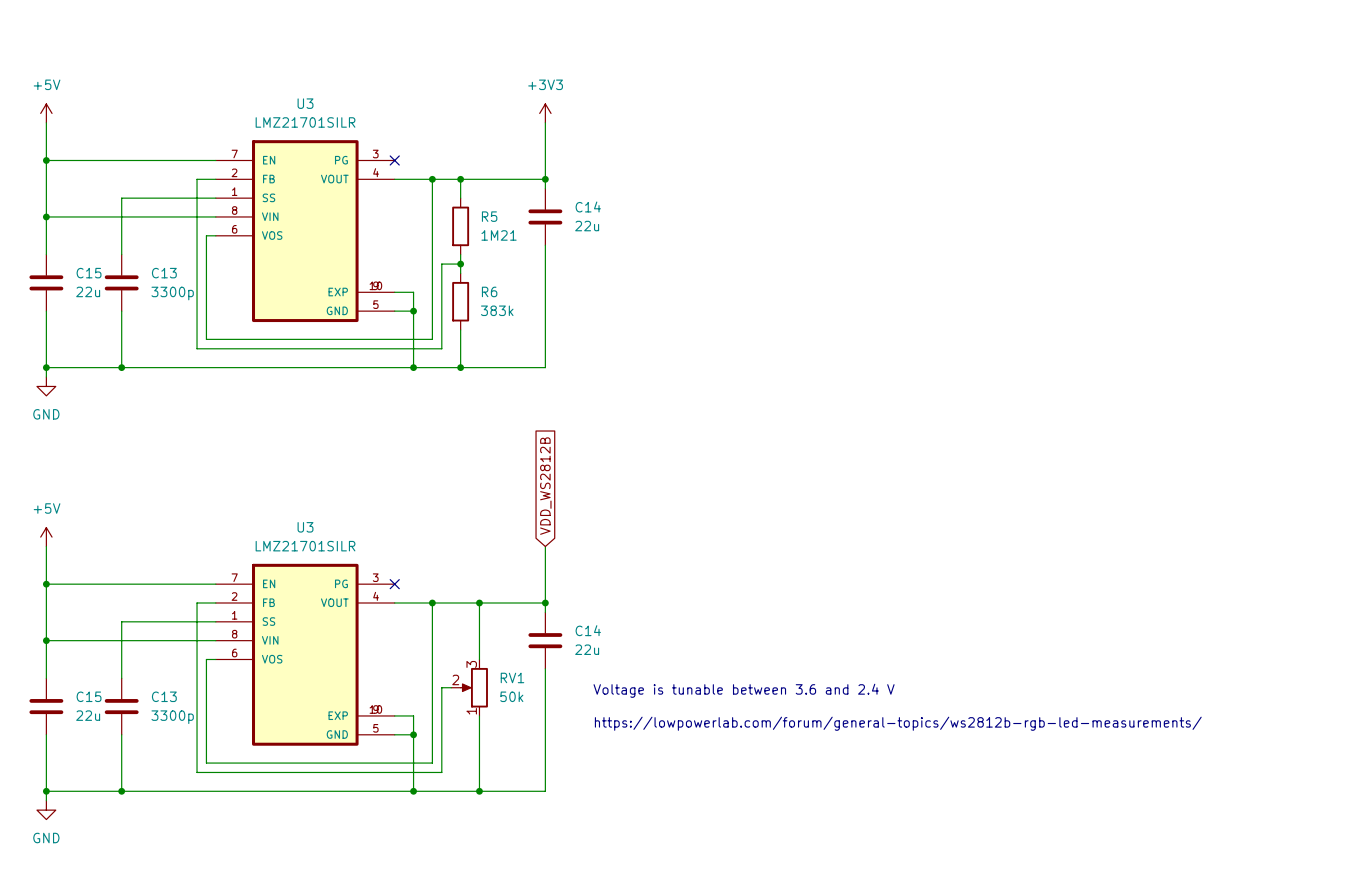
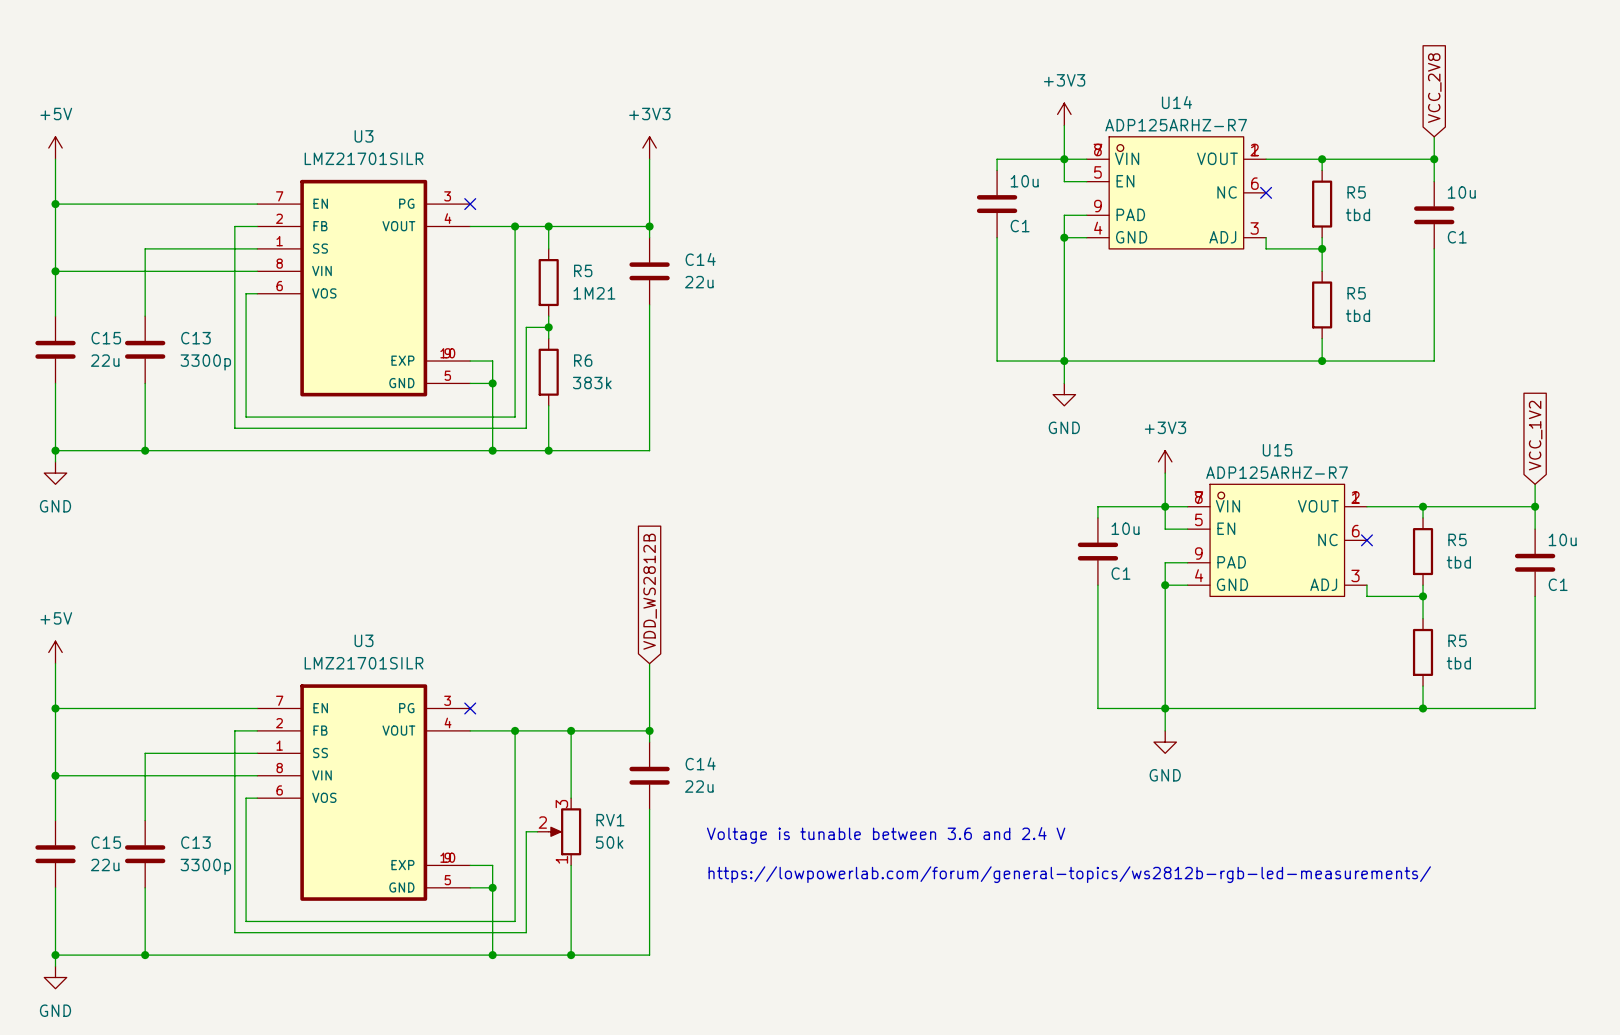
global label: none -> VCC_2V8 (1434, 88)
power symbol: none -> +3V3 (1064, 114)
wire: none -> (1064, 125) (1064, 181) (1086, 181)
wire: none -> (1434, 136) (1434, 181)
junction: none -> (1064, 159)
wire: none -> (1086, 159) (997, 159) (997, 170)
wire: none -> (1266, 159) (1434, 159)
wire: none -> (1322, 159) (1322, 170)
junction: none -> (1322, 159)
junction: none -> (1434, 159)
U14: none -> ADP125ARHZ-R7 (1176, 192)
no-connect mark: none -> (1266, 192)
C1: none -> 10u (997, 204)
R5: none -> tbd (1322, 204)
wire: none -> (1086, 215) (1064, 215) (1064, 383)
C1: none -> 10u (1434, 215)
wire: none -> (997, 237) (997, 361) (1434, 361) (1434, 248)
wire: none -> (1064, 237) (1086, 237)
junction: none -> (1064, 237)
wire: none -> (1266, 237) (1266, 248) (1322, 248)
wire: none -> (1322, 237) (1322, 271)
junction: none -> (1322, 248)
R5: none -> tbd (1322, 304)
wire: none -> (1322, 338) (1322, 361)
junction: none -> (1064, 361)
junction: none -> (1322, 361)
power symbol: none -> GND (1064, 394)
global label: none -> VCC_1V2 (1535, 435)
power symbol: none -> +3V3 (1165, 461)
wire: none -> (1165, 473) (1165, 529) (1187, 529)
wire: none -> (1535, 484) (1535, 529)
junction: none -> (1165, 506)
wire: none -> (1187, 506) (1097, 506) (1097, 517)
wire: none -> (1366, 506) (1535, 506)
wire: none -> (1423, 506) (1423, 517)
junction: none -> (1423, 506)
junction: none -> (1535, 506)
U15: none -> ADP125ARHZ-R7 (1277, 540)
no-connect mark: none -> (1366, 540)
C1: none -> 10u (1097, 551)
R5: none -> tbd (1423, 551)
wire: none -> (1187, 562) (1165, 562) (1165, 730)
C1: none -> 10u (1535, 562)
wire: none -> (1097, 585) (1097, 708) (1535, 708) (1535, 596)
wire: none -> (1165, 585) (1187, 585)
junction: none -> (1165, 585)
wire: none -> (1366, 585) (1366, 596) (1423, 596)
wire: none -> (1423, 585) (1423, 618)
junction: none -> (1423, 596)
R5: none -> tbd (1423, 652)
wire: none -> (1423, 686) (1423, 708)
junction: none -> (1165, 708)
junction: none -> (1423, 708)
power symbol: none -> GND (1165, 742)

